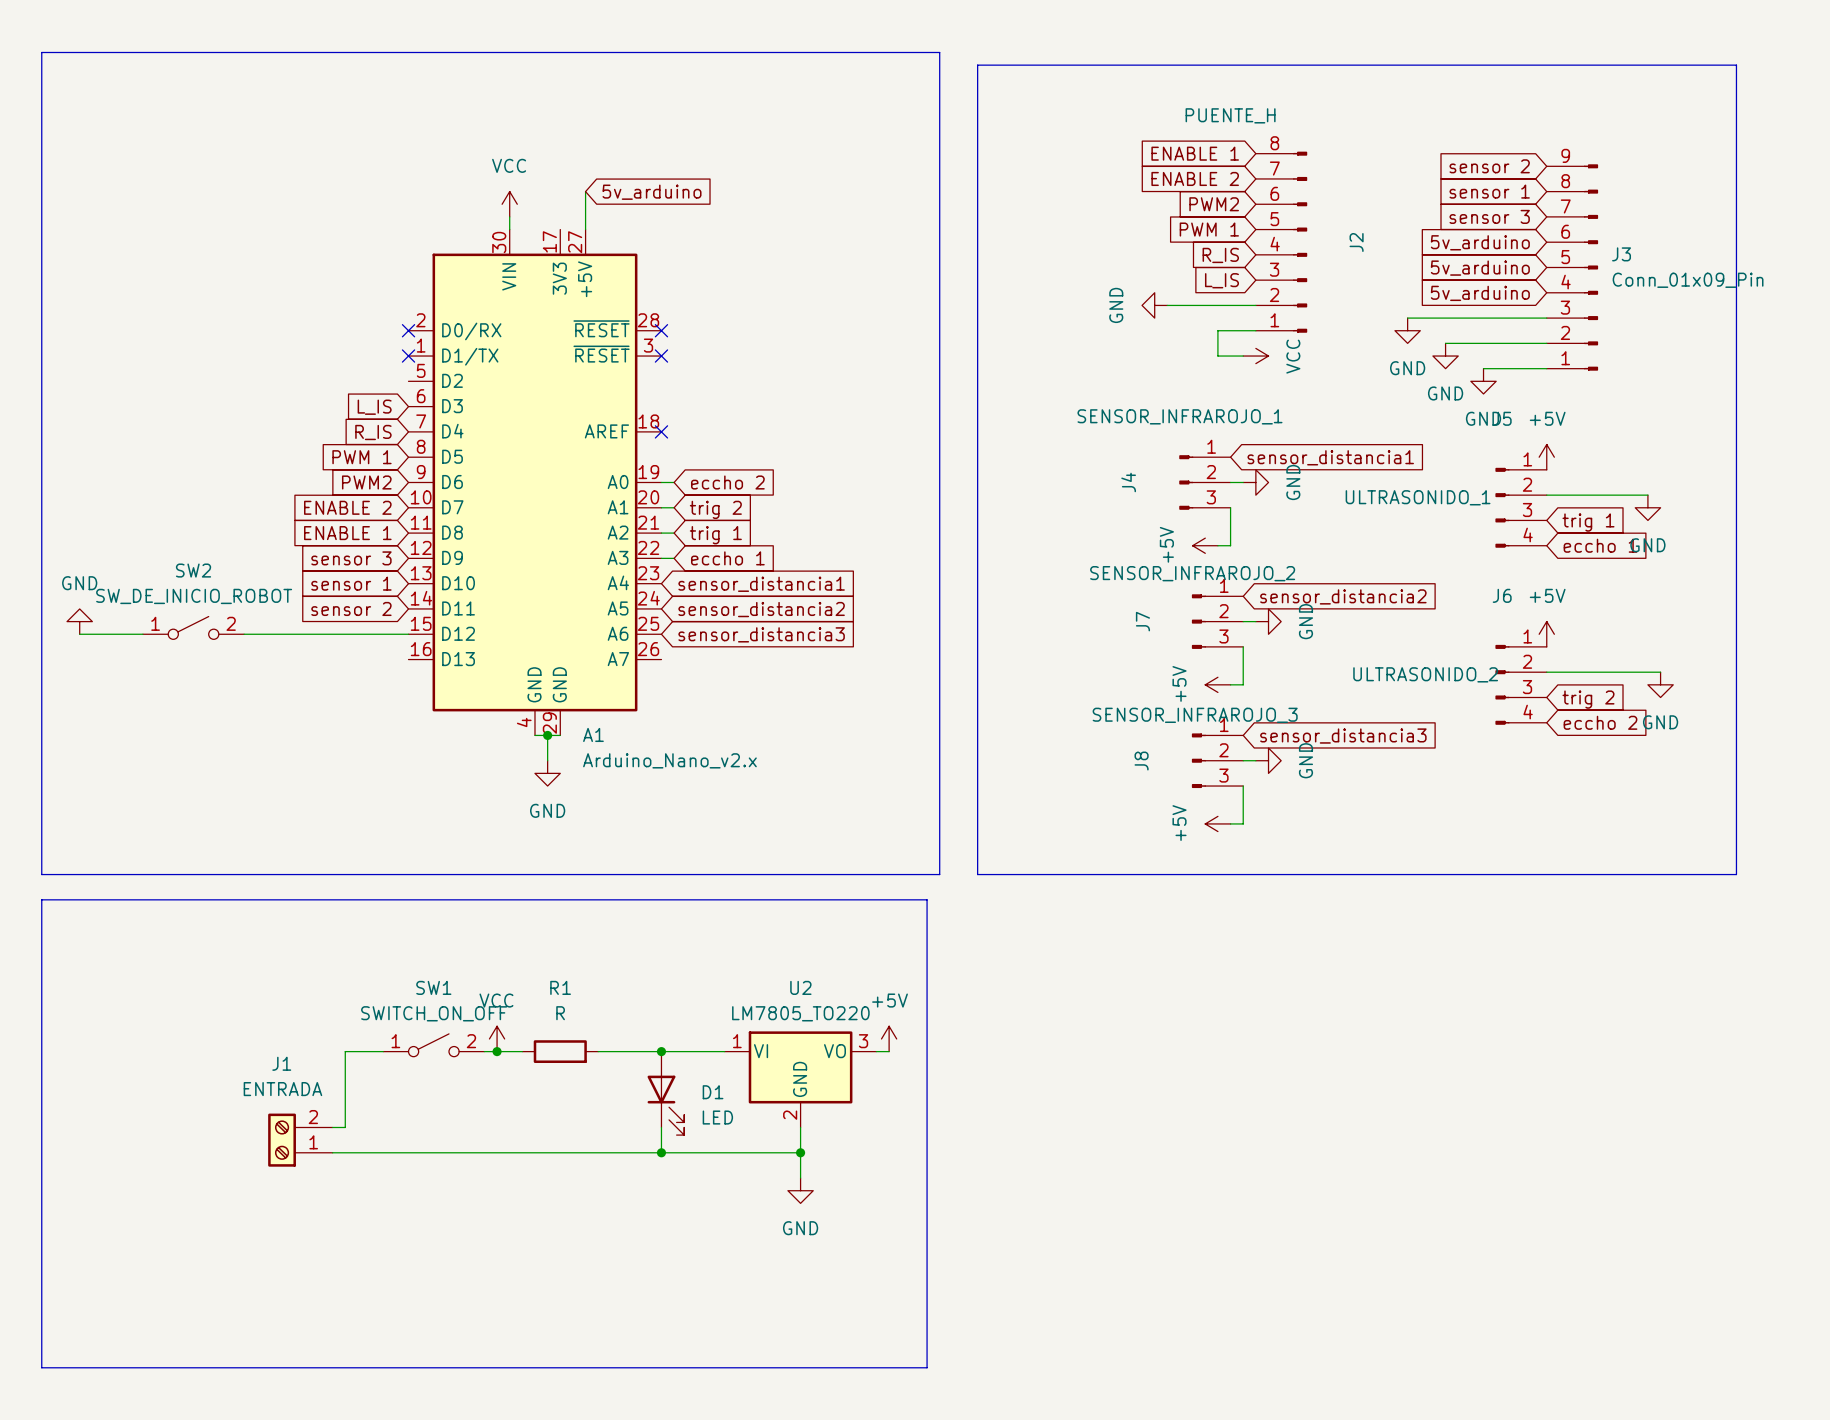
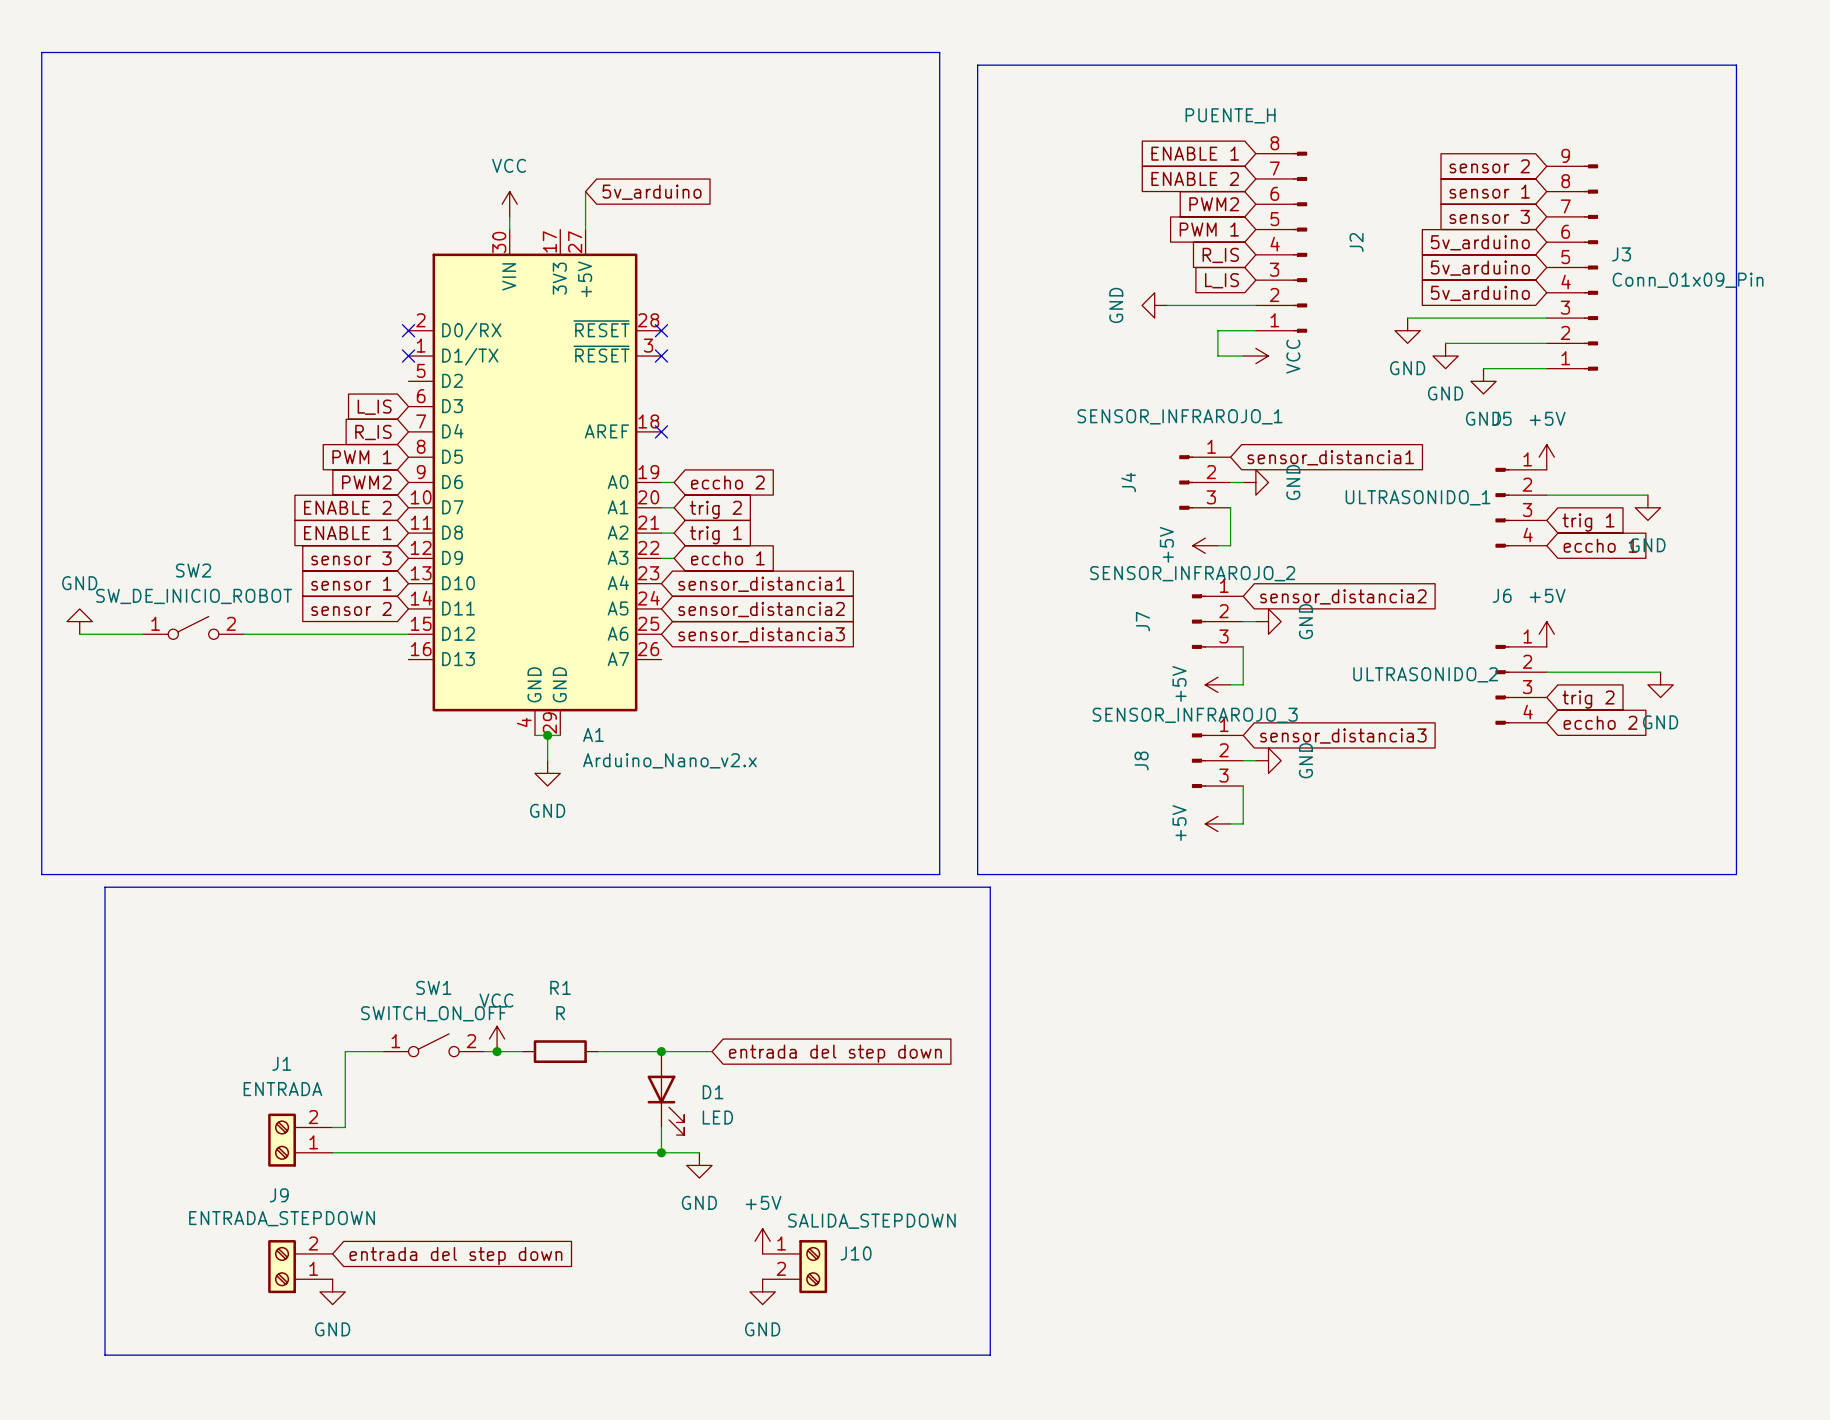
line: (41, 899) (927, 899) (927, 1367) (41, 1367) (41, 899) -> (104, 887) (990, 887) (990, 1355) (104, 1355) (104, 887)
power symbol position: +5V (889, 1038) -> +5V (762, 1241)
wire: (712, 1051) (724, 1051) -> none
wire: (876, 1051) (889, 1051) -> none
global label: none -> entrada del step down (835, 1053)
U2: LM7805_TO220 (800, 1079) -> none
wire: (800, 1127) (800, 1178) -> none
wire: (699, 1152) (800, 1152) -> none
junction: (800, 1152) -> none
power symbol: none -> GND (699, 1165)
power symbol: GND (800, 1190) -> none
global label: none -> entrada del step down (455, 1256)
J9: none -> ENTRADA_STEPDOWN (300, 1266)
J10: none -> SALIDA_STEPDOWN (794, 1266)
power symbol: none -> GND (332, 1291)
power symbol: none -> GND (762, 1291)

